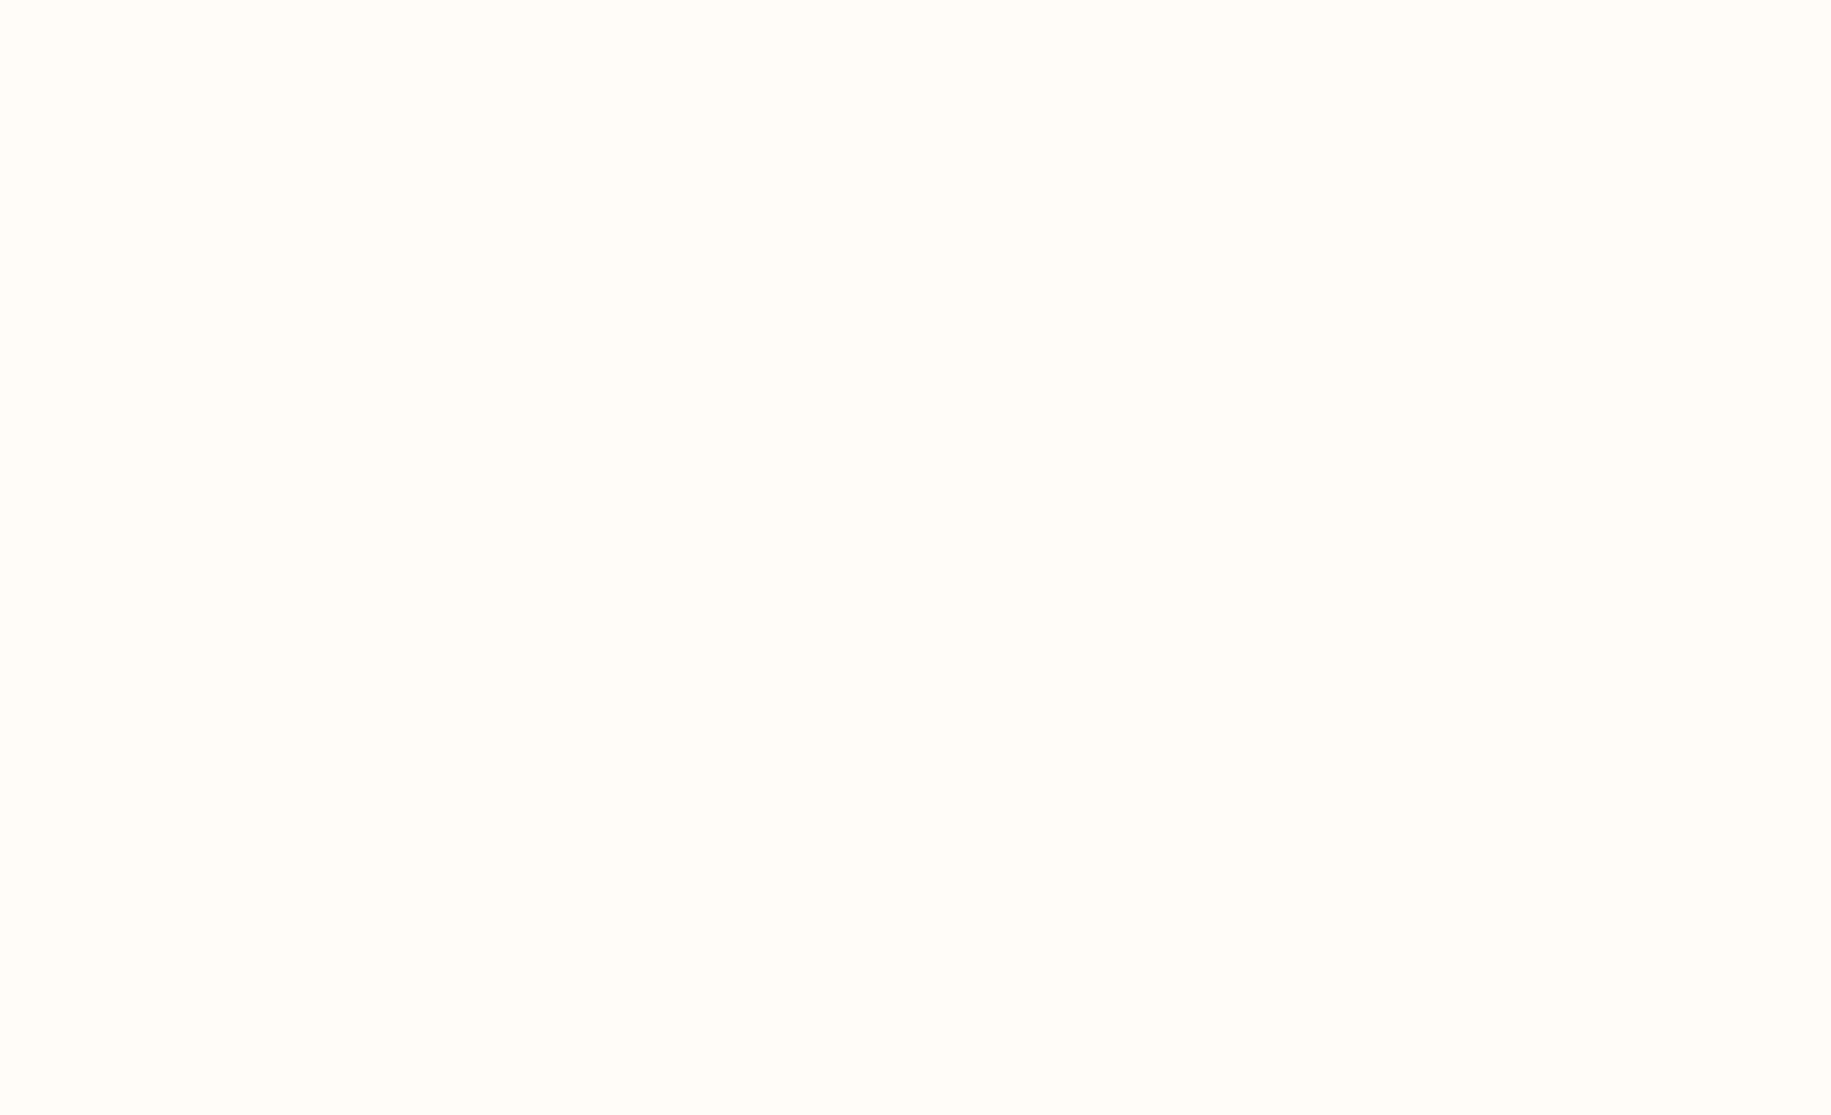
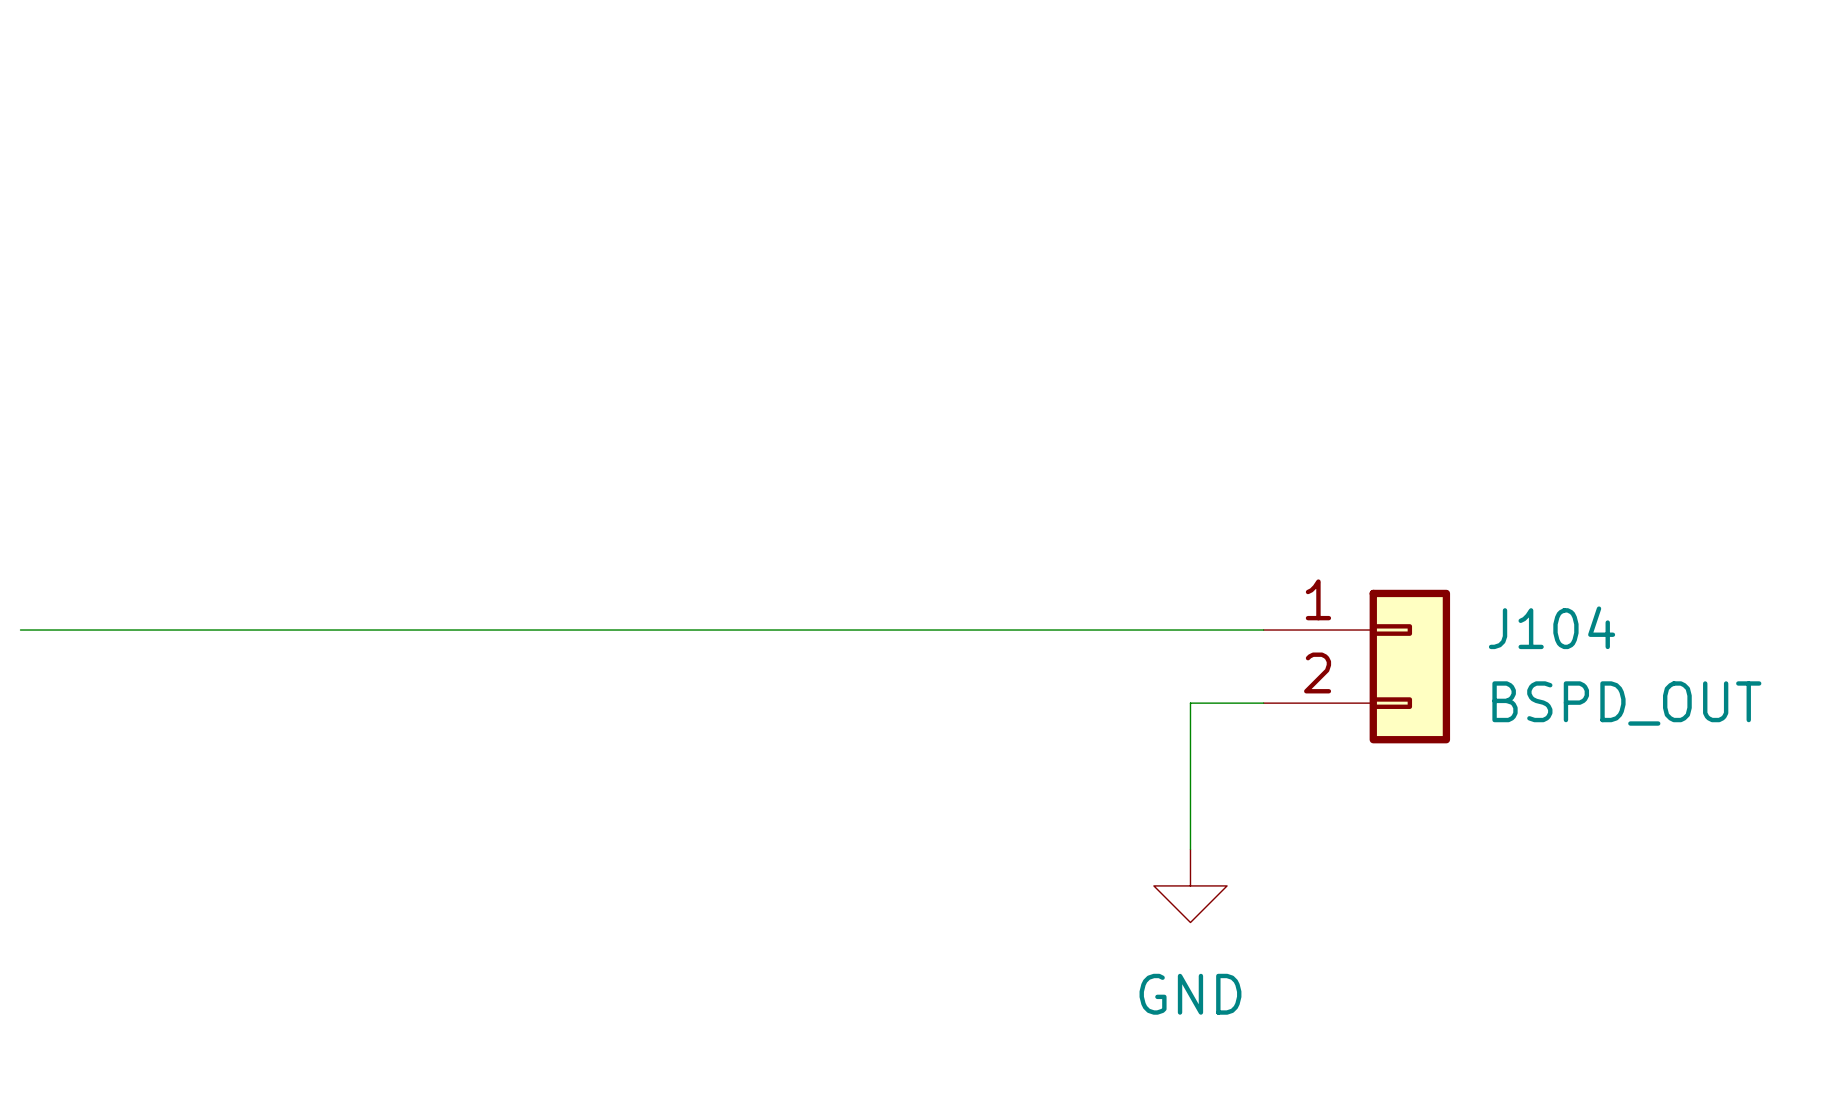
wire: none -> (20, 630) (1263, 630)
J104: none -> BSPD_OUT (1356, 666)
wire: none -> (1263, 703) (1190, 703) (1190, 849)
power symbol: none -> GND (1190, 885)

